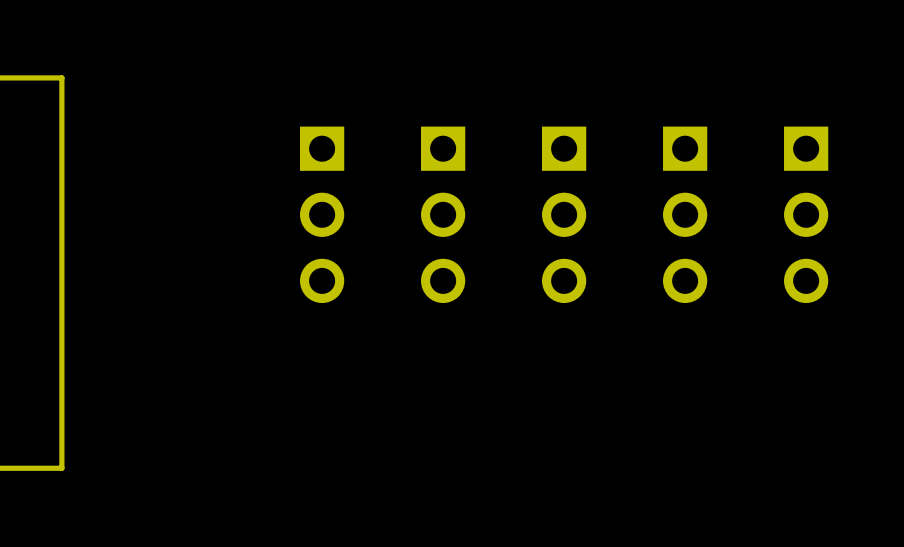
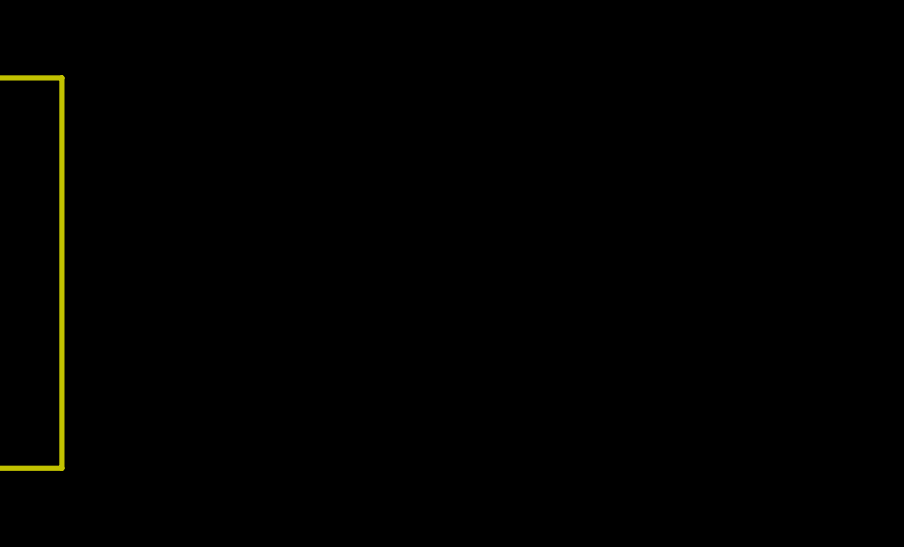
part: (322, 214) -> none
part: (443, 214) -> none
part: (564, 214) -> none
part: (685, 214) -> none
part: (806, 214) -> none

